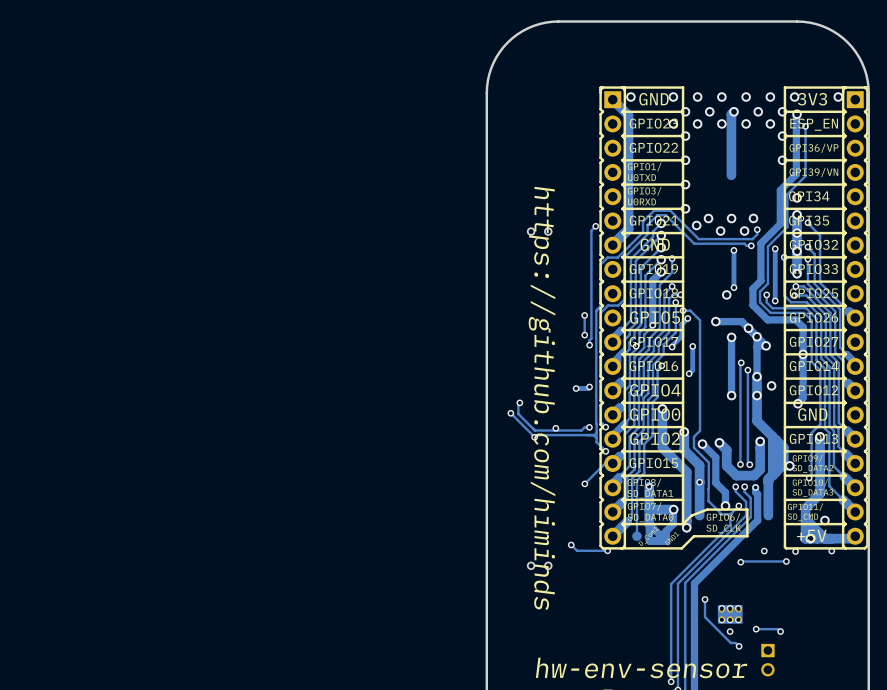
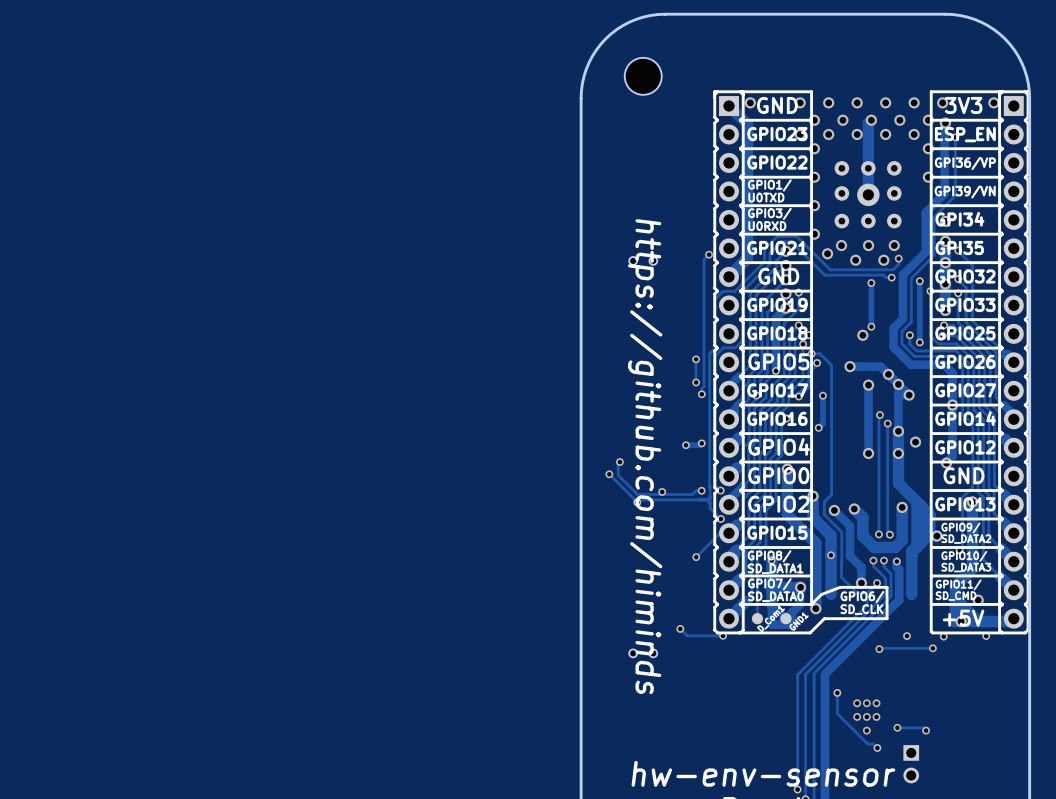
part: none -> (643, 76)
part: none -> (868, 194)
part: (730, 614) -> none

